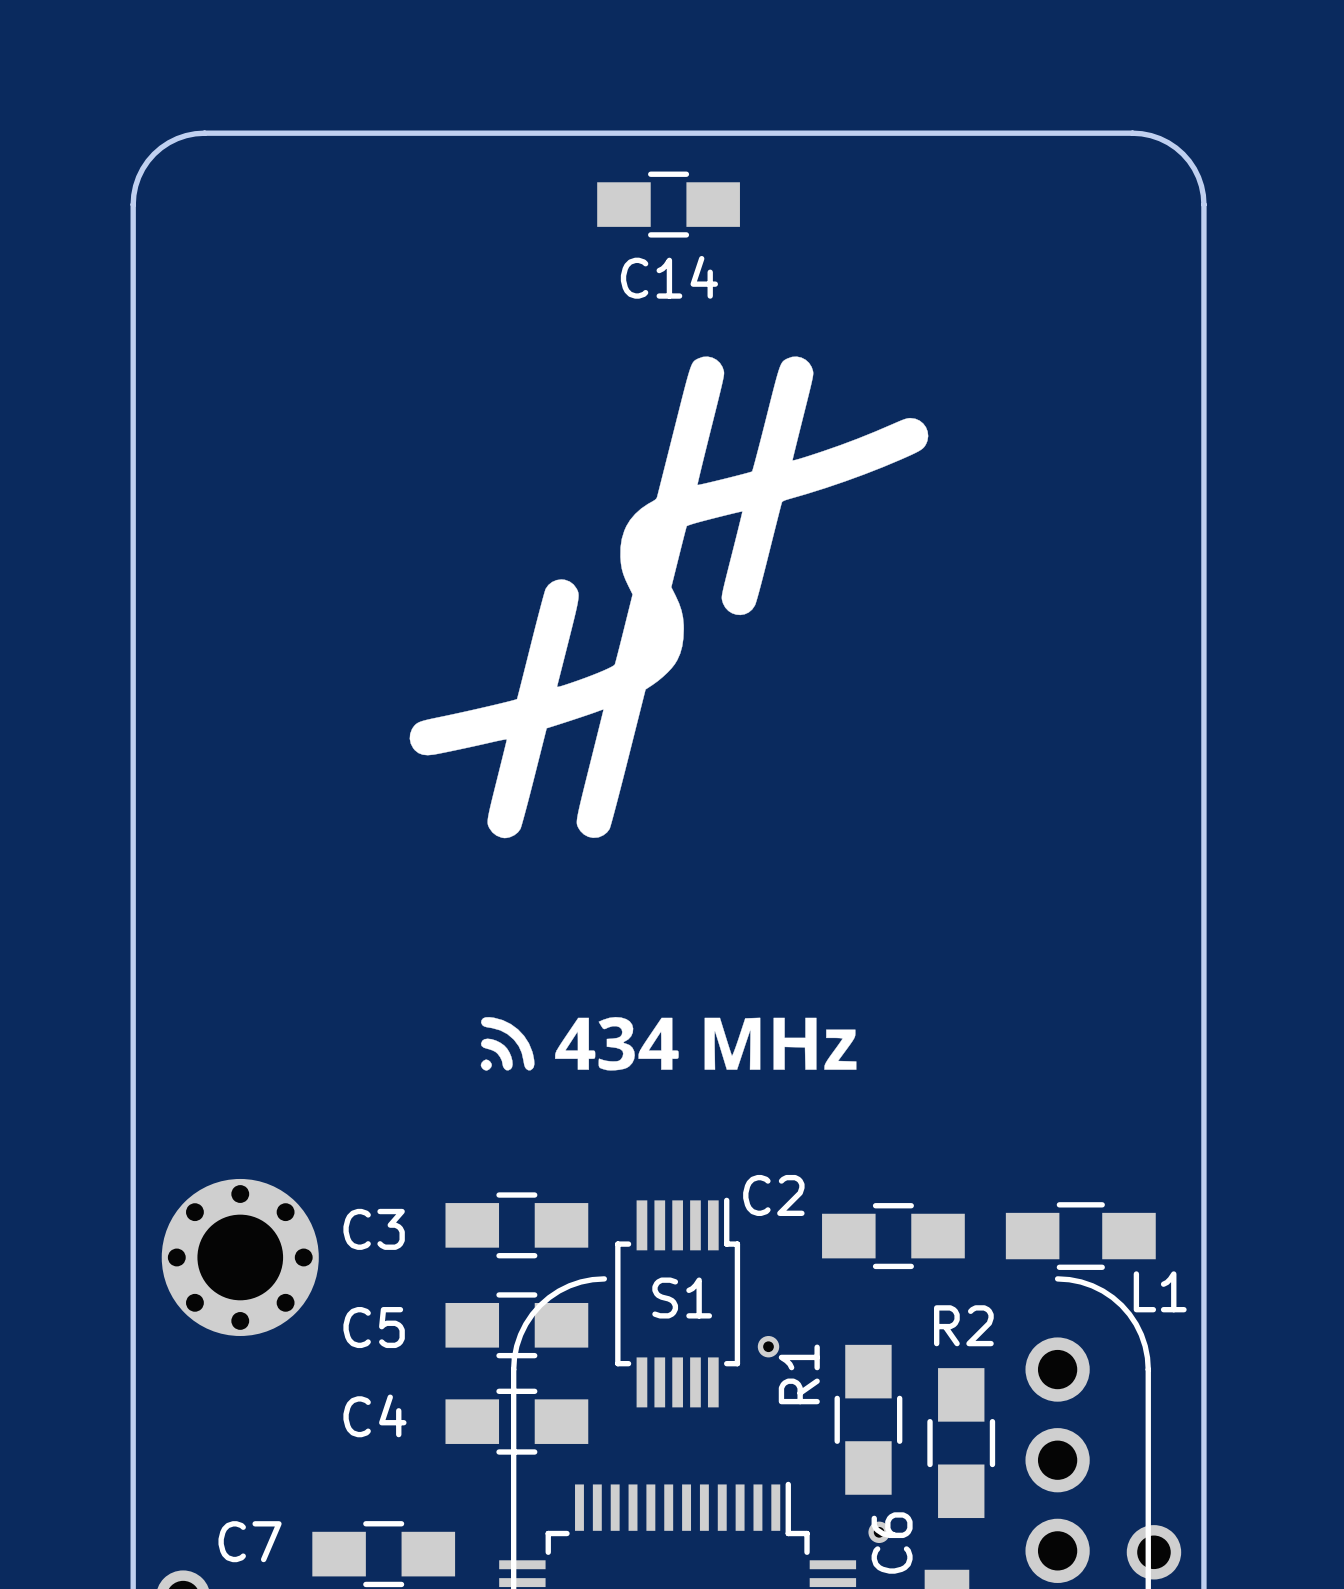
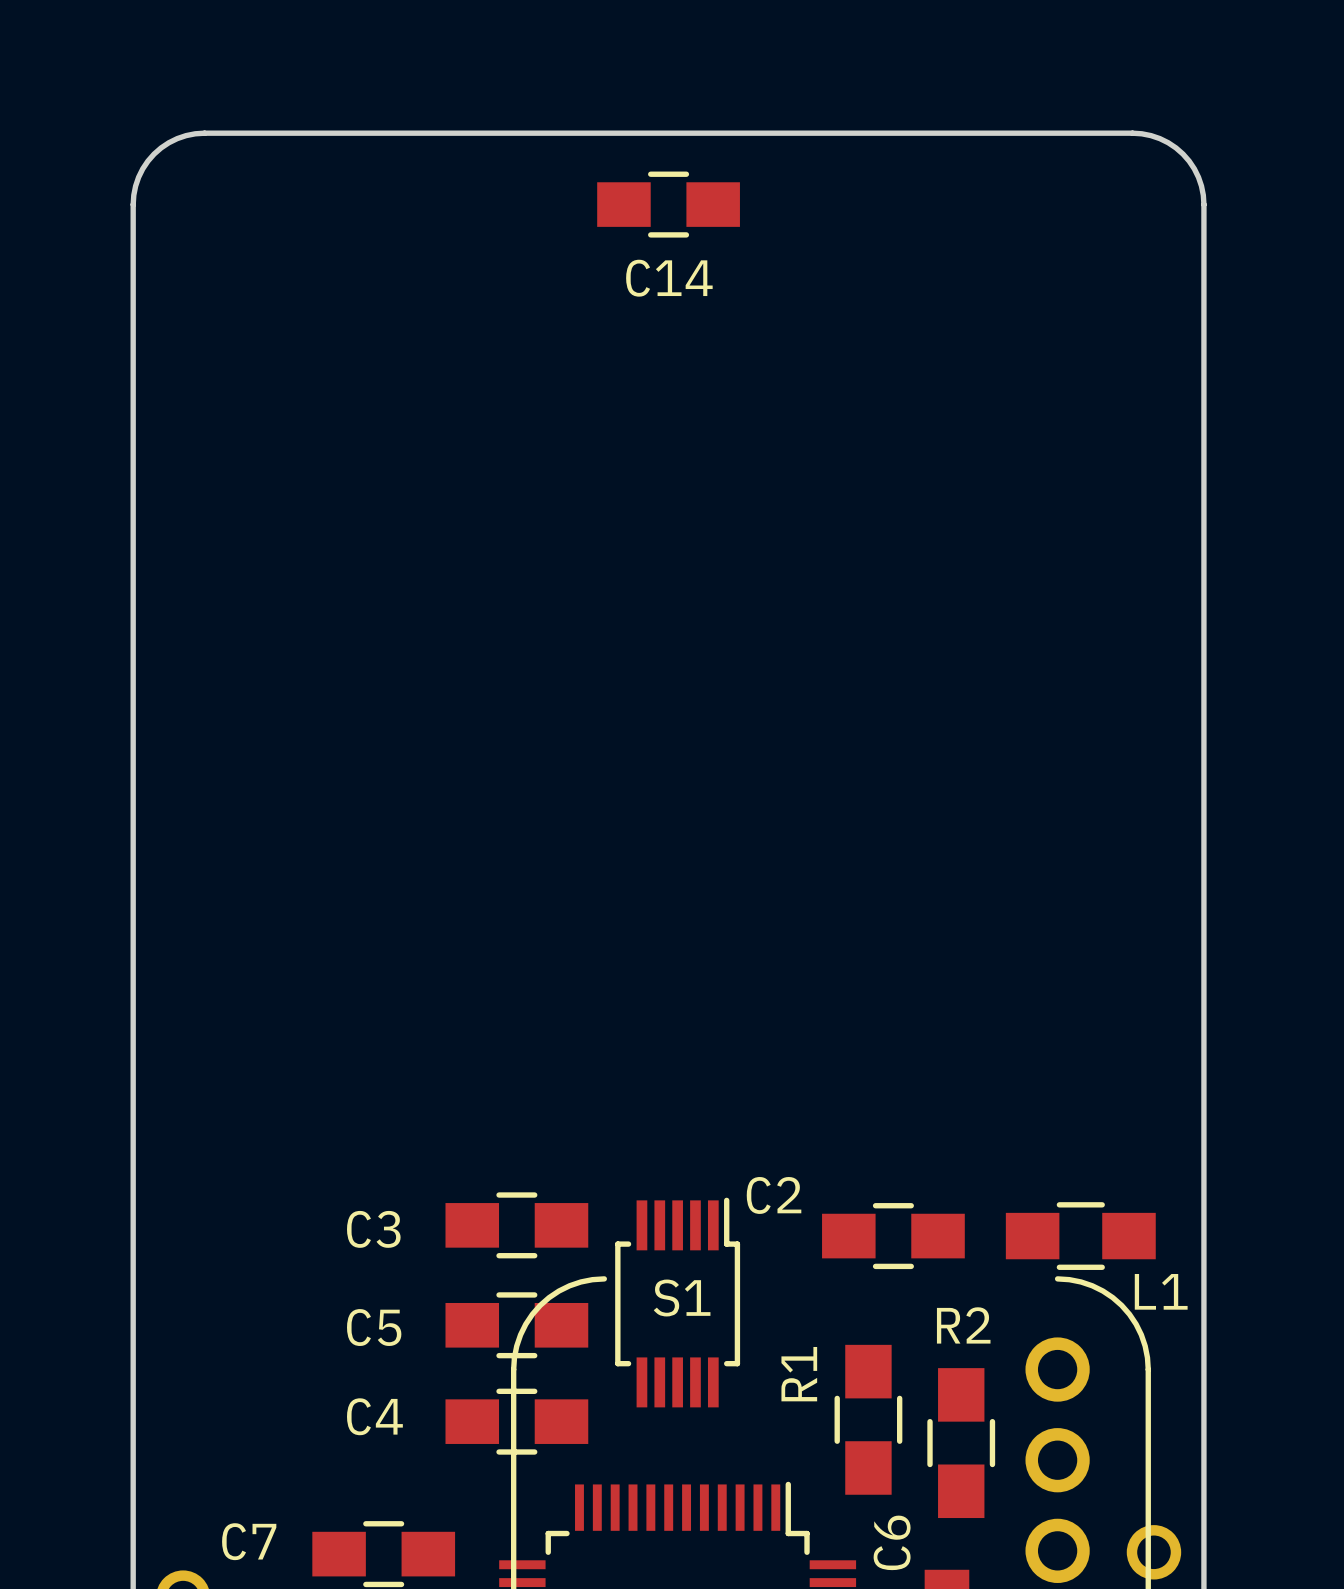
drawing: [409, 356, 929, 839] -> none
drawing: [480, 1016, 857, 1071] -> none
part: (240, 1257) -> none
part: (768, 1346) -> none
part: (879, 1532) -> none

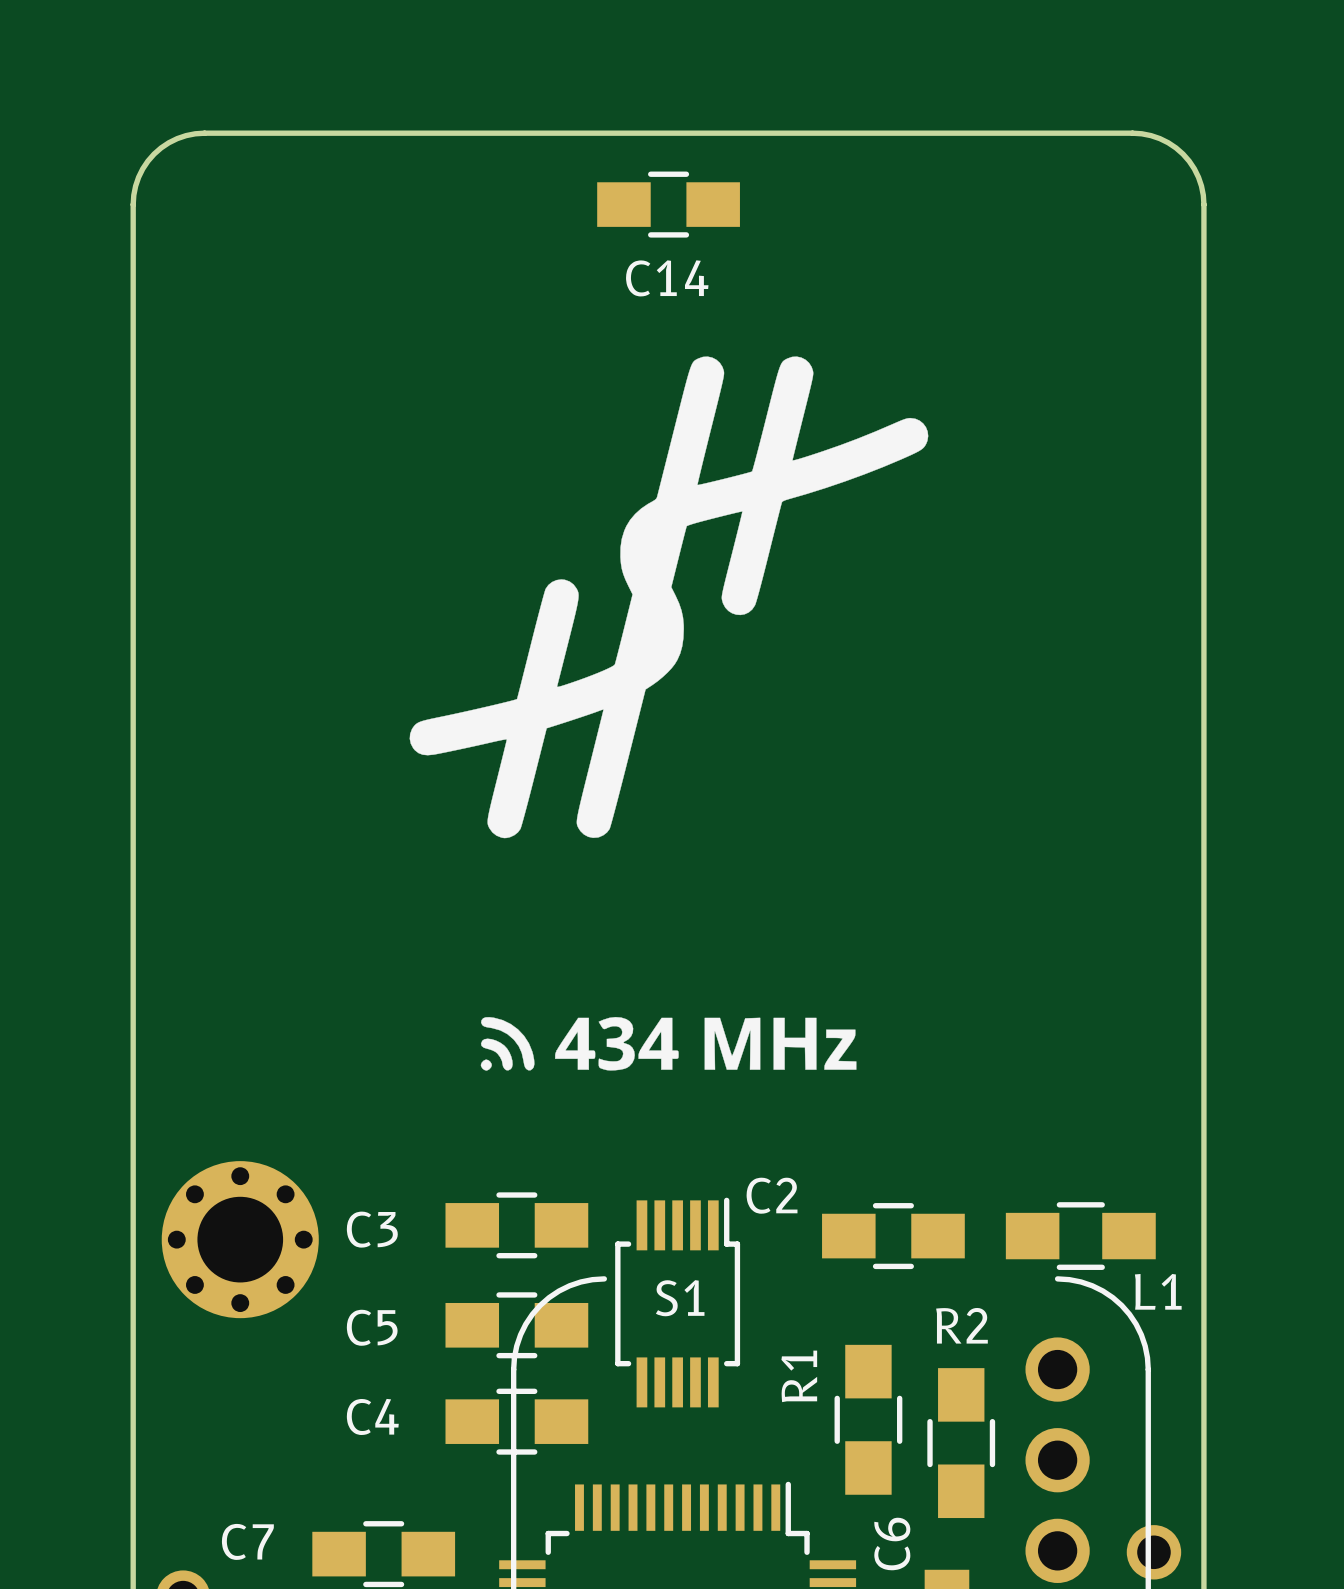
drawing: none -> [409, 356, 929, 839]
drawing: none -> [480, 1016, 857, 1071]
part: none -> (240, 1239)

